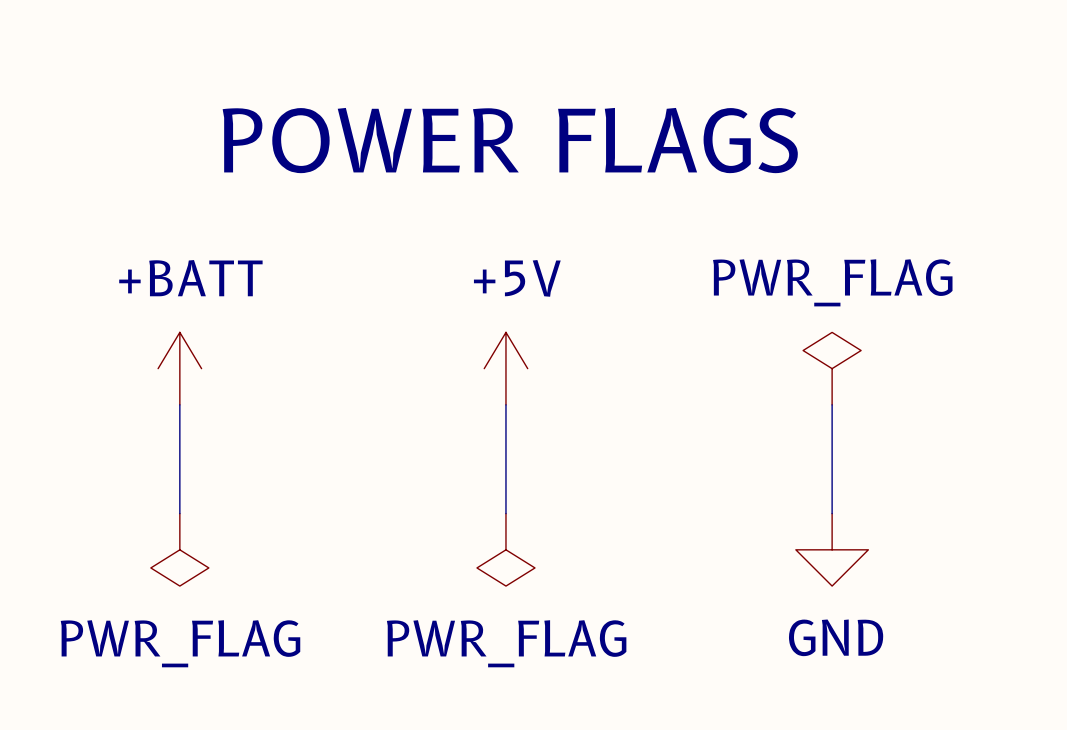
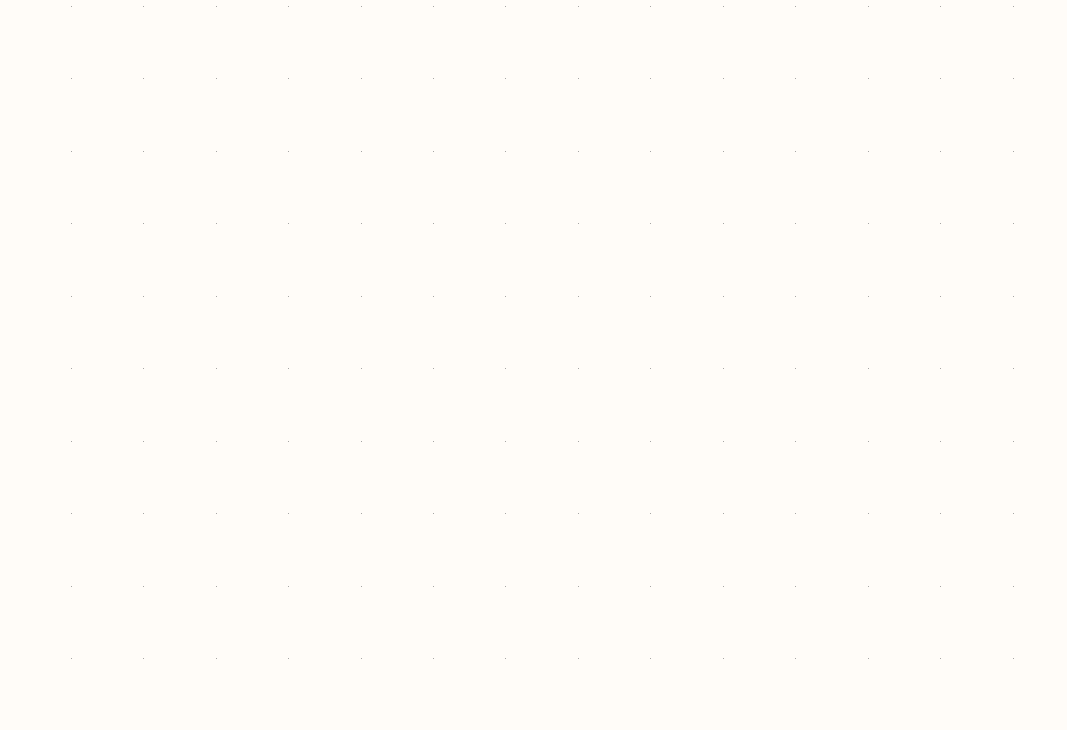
text: POWER FLAGS (510, 140) -> none
power symbol: +BATT (179, 368) -> none
power symbol: +5V (505, 368) -> none
power symbol: PWR_FLAG (832, 368) -> none
wire: (179, 404) (179, 513) -> none
wire: (505, 404) (505, 513) -> none
wire: (832, 404) (832, 513) -> none
power symbol: PWR_FLAG (179, 549) -> none
power symbol: PWR_FLAG (505, 549) -> none
power symbol: GND (832, 549) -> none

